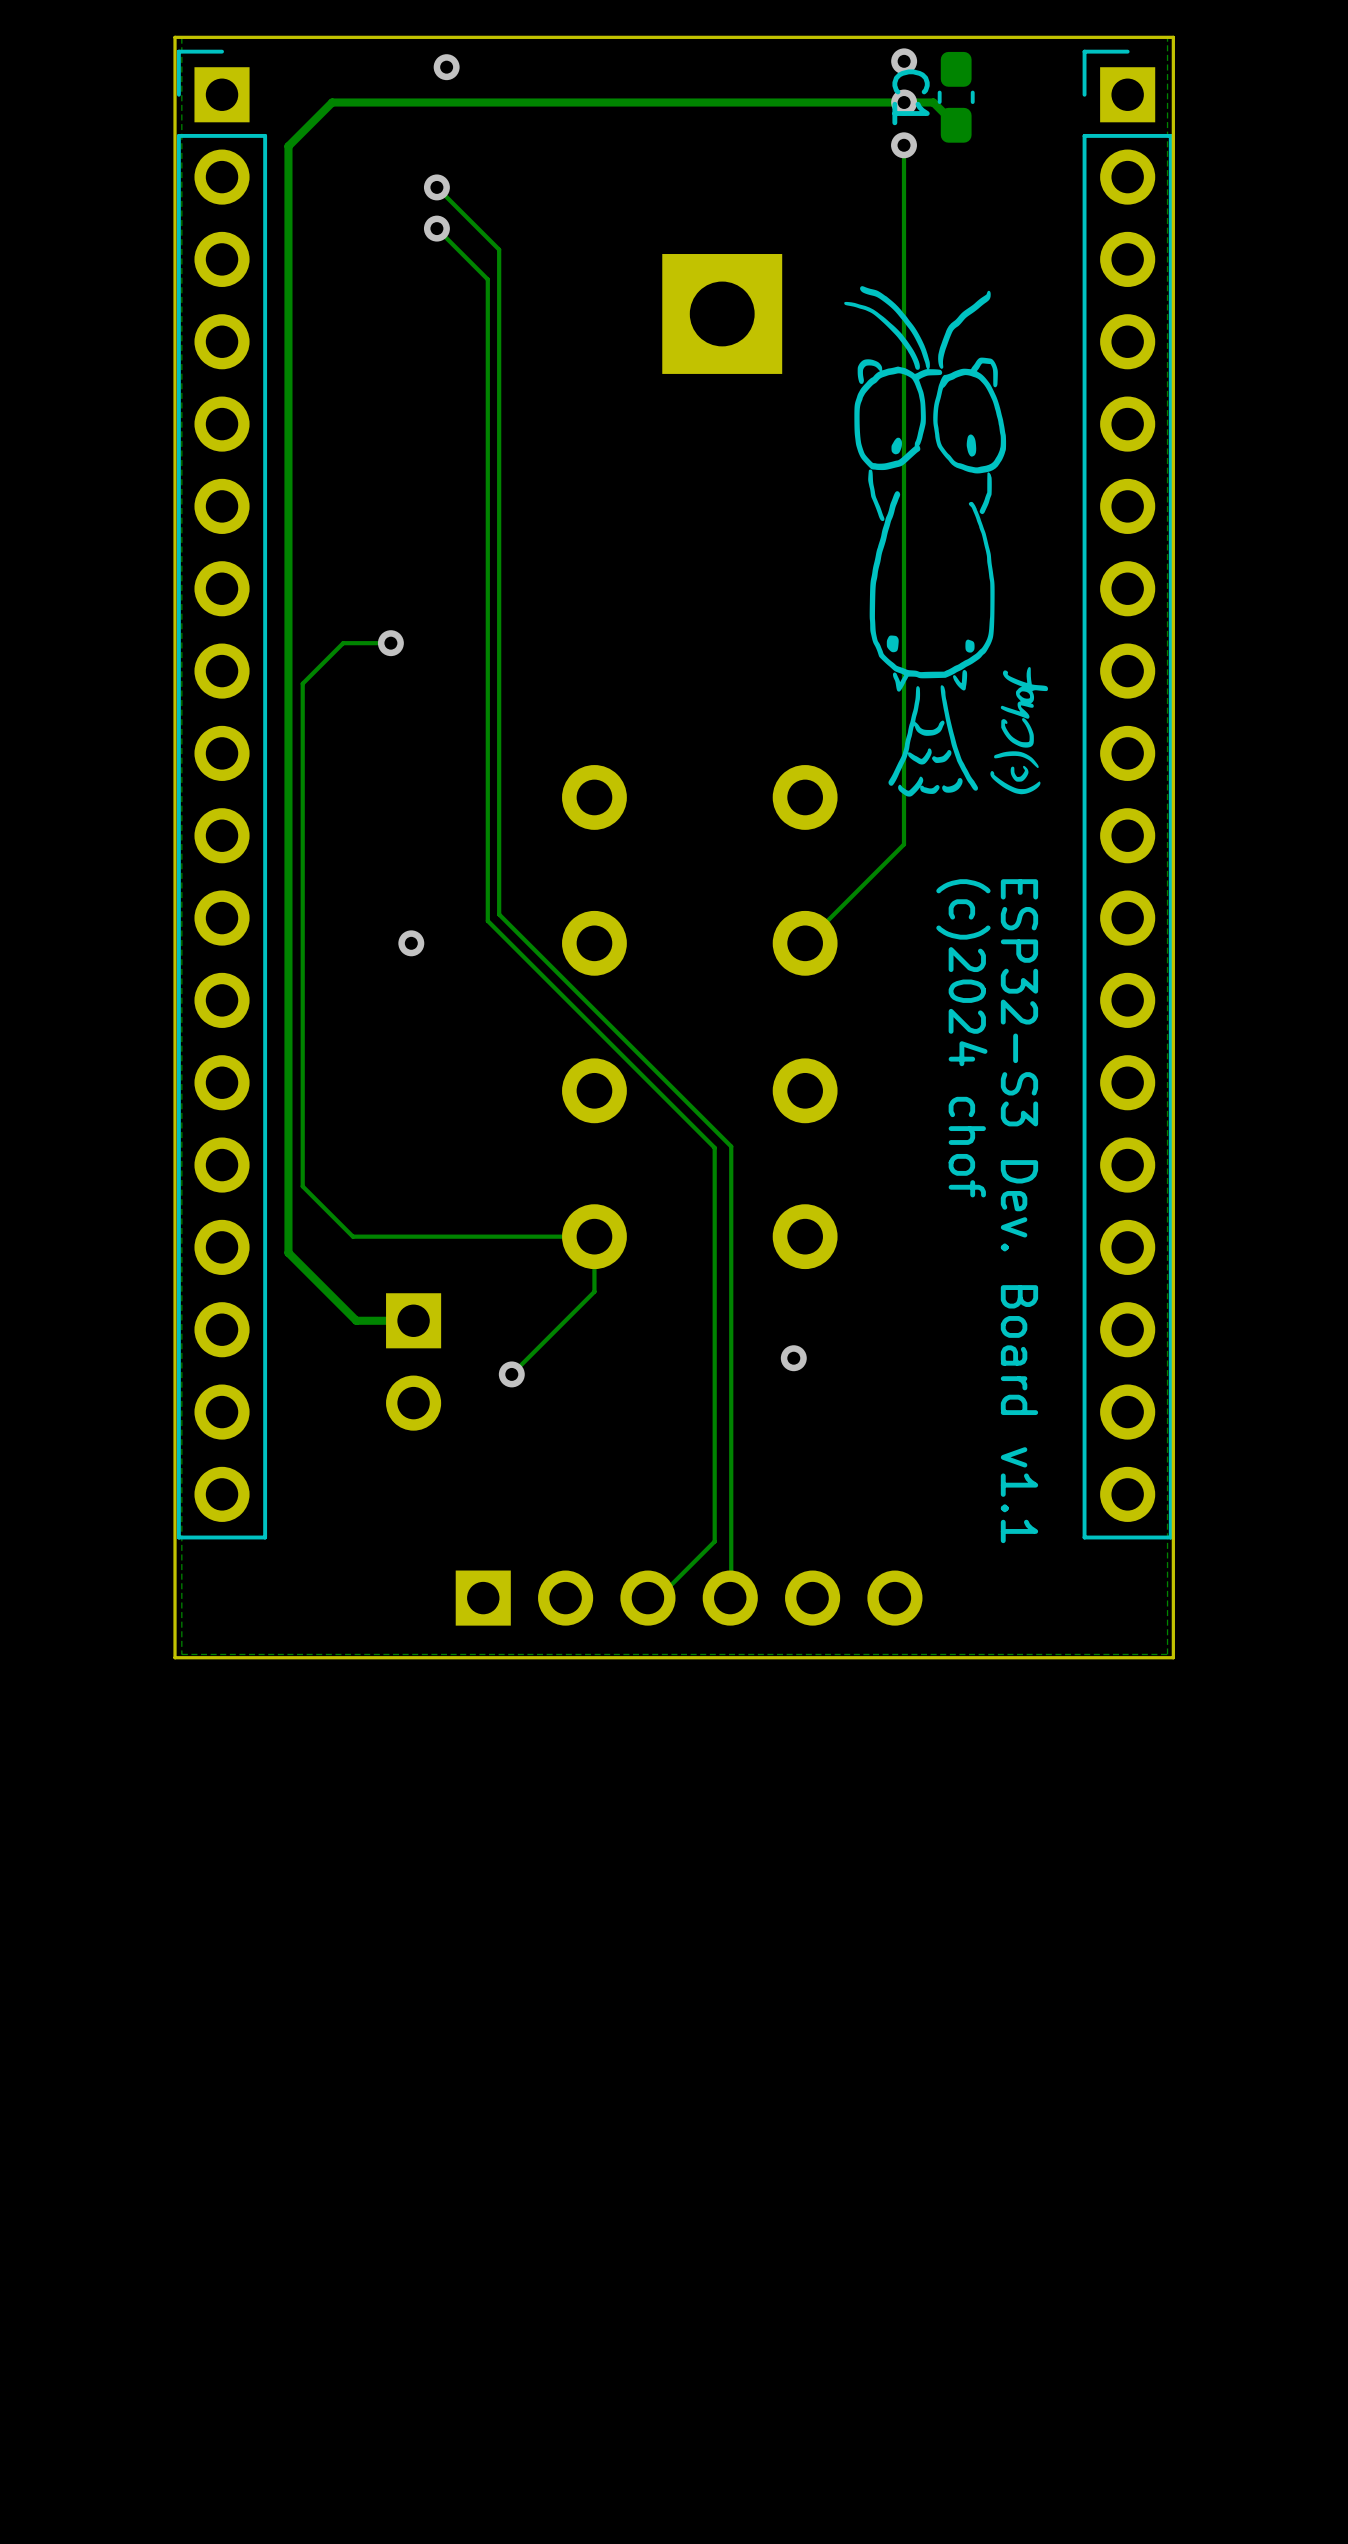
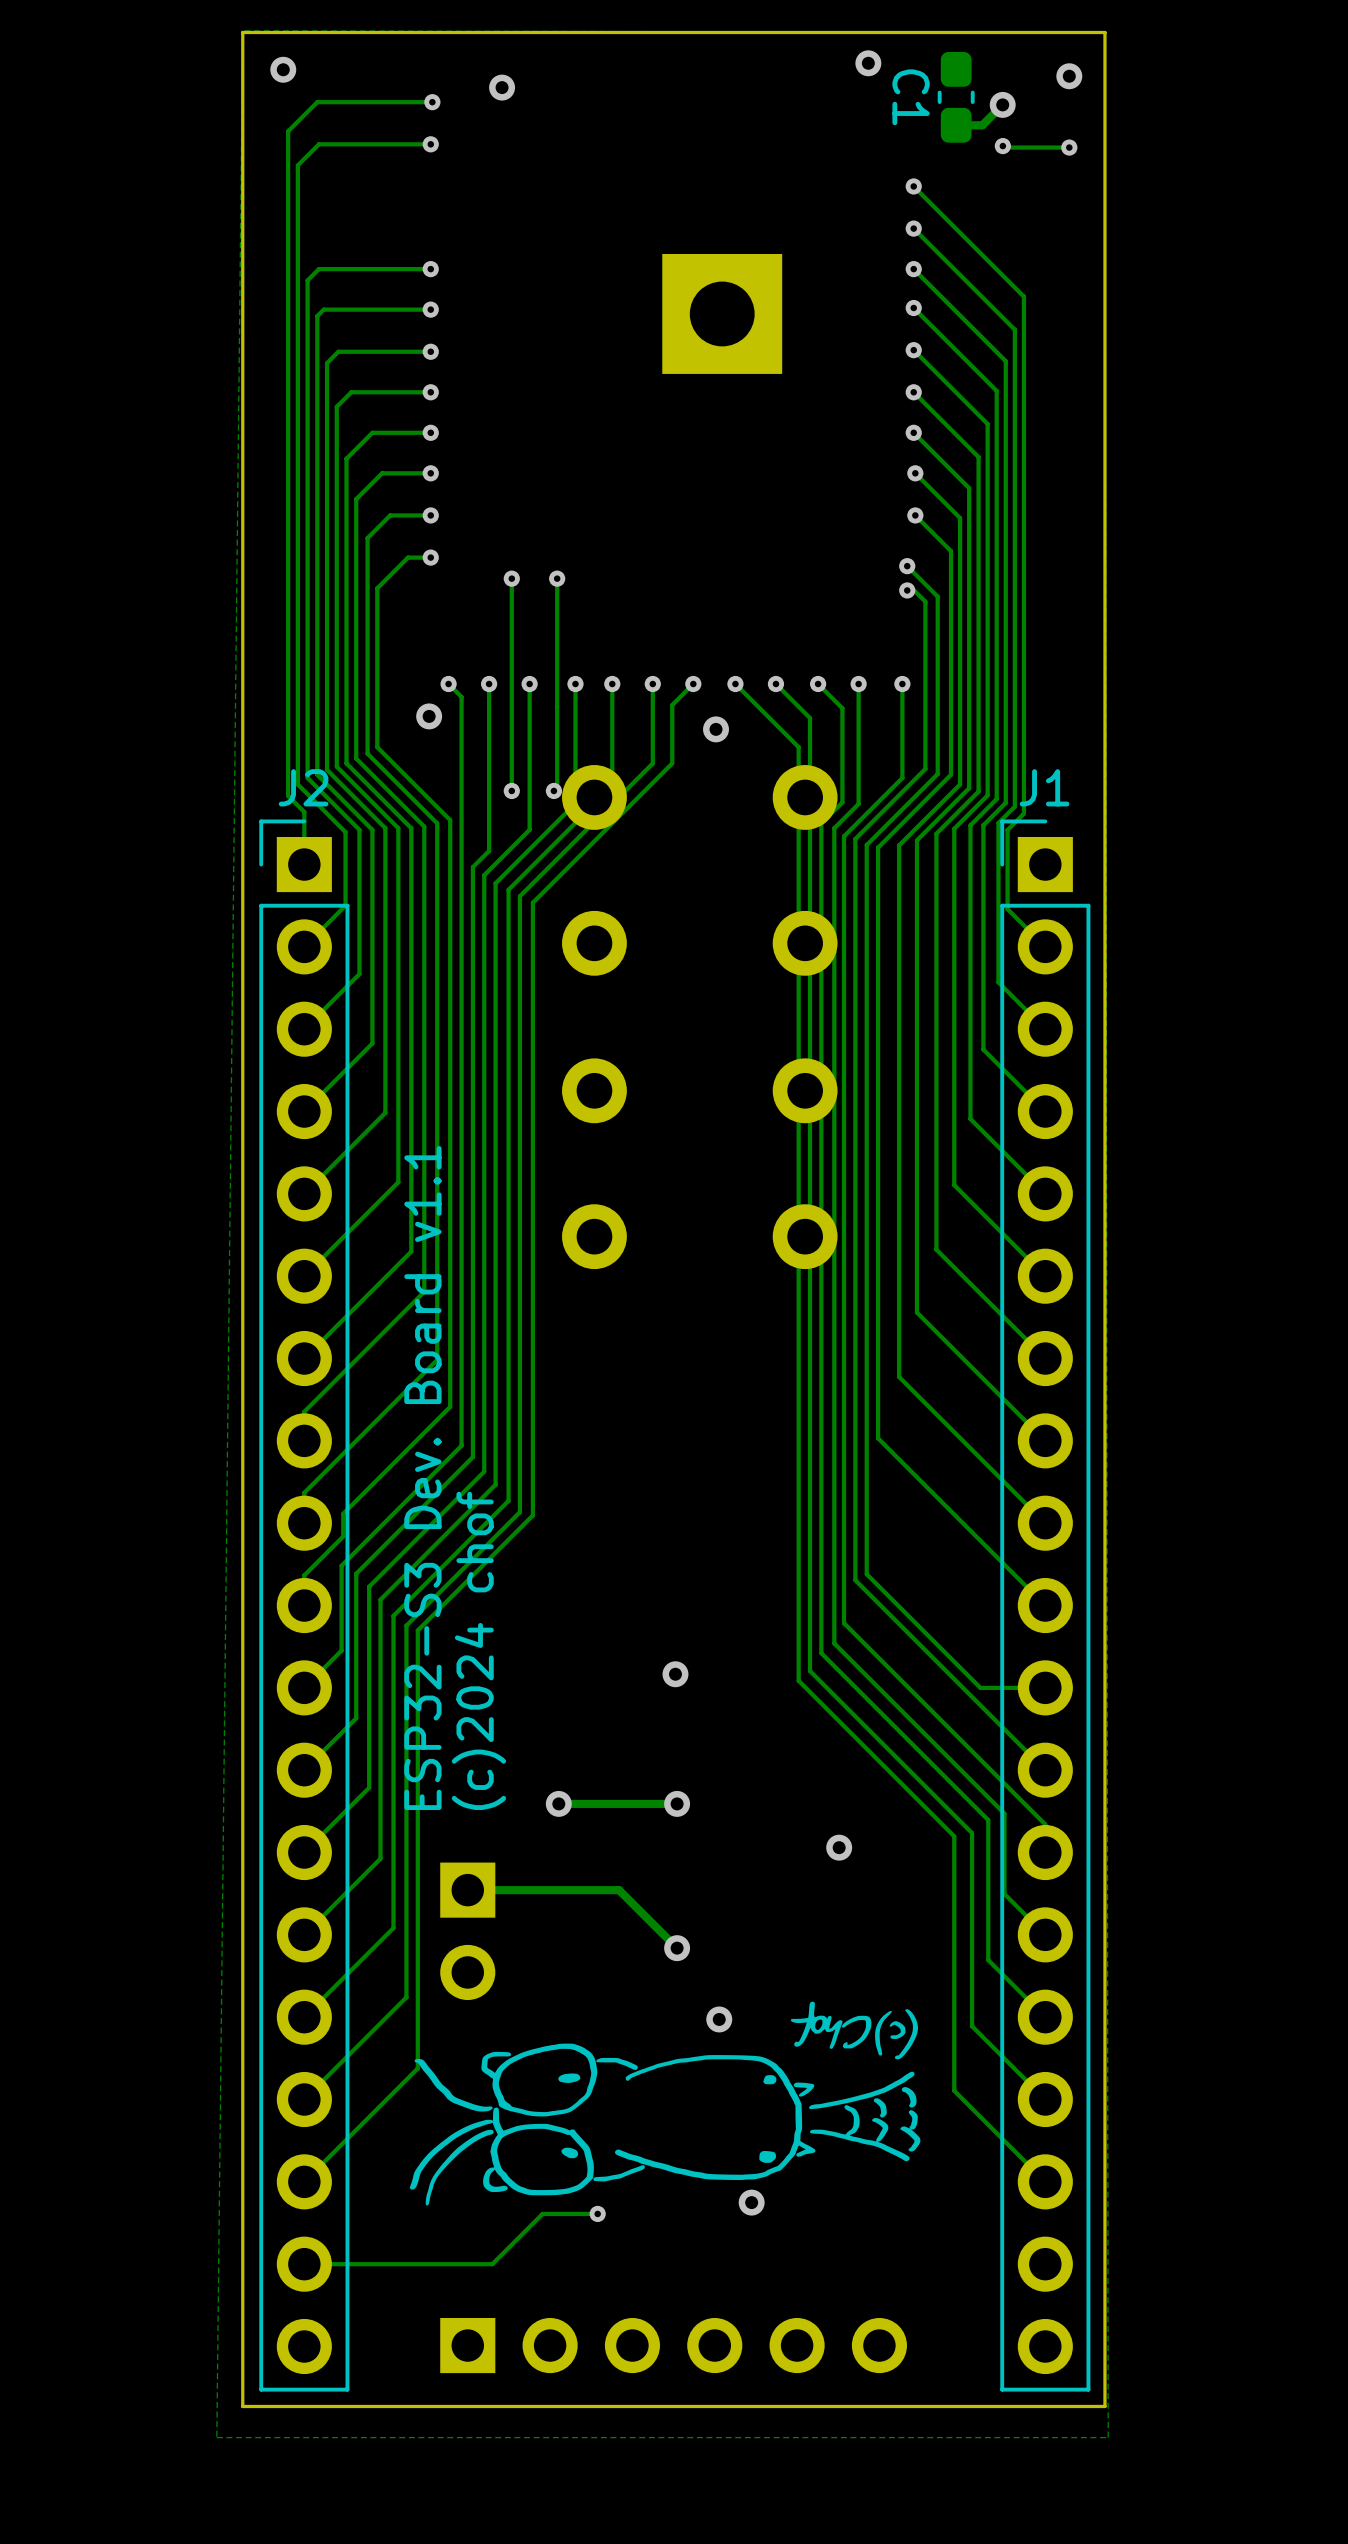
zone outline: (1167, 37) (1167, 1654) (181, 1654) (181, 37) (1167, 37) -> (242, 30) (1104, 32) (1108, 2437) (216, 2437) (242, 30)
board edge: (1173, 37) (175, 37) (175, 1657) (1173, 1657) (1173, 37) -> (1104, 32) (1104, 2406) (242, 2406) (242, 32) (1104, 32)
via: (904, 61) -> none
via: none -> (868, 63)
via position: (446, 67) -> (502, 87)
via: none -> (283, 69)
via: none -> (1069, 76)
track: none -> (432, 102) (317, 102) (288, 131) (288, 795) (304, 812) (304, 864)
via: none -> (432, 102)
via: (904, 102) -> none
via: none -> (1002, 104)
track: (956, 125) (933, 102) (332, 102) (288, 146) (288, 1252) (356, 1320) (413, 1320) -> (956, 125) (982, 125) (1002, 104)
track: none -> (430, 144) (318, 144) (297, 165) (297, 784) (345, 832) (345, 905) (304, 946)
via: none -> (430, 144)
track: (904, 145) (904, 844) (805, 943) -> none
via: (904, 145) -> none
track: none -> (1002, 146) (1069, 147)
via: none -> (1002, 146)
via: none -> (1069, 147)
track: none -> (913, 186) (1023, 296) (1023, 813) (1007, 830) (1007, 909) (1045, 946)
via: none -> (913, 186)
track: (436, 187) (499, 249) (499, 914) (731, 1146) (731, 1607) -> none
via: (436, 187) -> none
track: (436, 228) (487, 279) (487, 920) (714, 1147) (714, 1541) (648, 1607) -> none
via: (436, 228) -> none
track: none -> (913, 228) (1014, 329) (1014, 806) (998, 823) (998, 982) (1045, 1029)
via: none -> (913, 228)
track: none -> (430, 269) (318, 269) (307, 280) (307, 778) (359, 829) (359, 974) (304, 1029)
via: none -> (430, 269)
track: none -> (913, 269) (1005, 361) (1005, 802) (983, 825) (983, 1049) (1045, 1111)
via: none -> (913, 269)
drawing: [844, 286, 1049, 797] -> none
track: none -> (913, 308) (996, 390) (996, 799) (970, 825) (970, 1119) (1045, 1193)
via: none -> (913, 308)
track: none -> (430, 309) (323, 309) (317, 316) (317, 774) (372, 829) (372, 1043) (304, 1111)
via: none -> (430, 309)
track: none -> (913, 350) (987, 424) (987, 795) (954, 828) (954, 1185) (1045, 1276)
via: none -> (913, 350)
track: none -> (430, 351) (338, 351) (327, 363) (327, 769) (385, 828) (385, 1112) (304, 1193)
via: none -> (430, 351)
track: none -> (430, 392) (351, 392) (336, 406) (336, 766) (398, 828) (398, 1182) (304, 1276)
via: none -> (430, 392)
track: none -> (913, 392) (978, 457) (978, 791) (936, 833) (936, 1249) (1045, 1358)
via: none -> (913, 392)
track: none -> (430, 432) (372, 432) (346, 458) (346, 763) (411, 828) (411, 1251) (304, 1358)
via: none -> (430, 432)
track: none -> (913, 432) (969, 488) (969, 788) (916, 840) (916, 1312) (1045, 1440)
via: none -> (913, 432)
track: none -> (430, 473) (382, 473) (356, 499) (356, 758) (424, 826) (424, 1291) (304, 1411) (304, 1440)
via: none -> (430, 473)
track: none -> (915, 473) (960, 518) (960, 784) (899, 845) (899, 1377) (1045, 1523)
via: none -> (915, 473)
track: none -> (430, 515) (390, 515) (367, 538) (367, 753) (437, 823) (437, 1359) (304, 1492) (304, 1523)
via: none -> (430, 515)
track: none -> (915, 515) (951, 551) (951, 774) (878, 847) (878, 1438) (1045, 1605)
via: none -> (915, 515)
track: none -> (430, 557) (408, 557) (377, 588) (377, 747) (450, 820) (450, 1406) (343, 1513) (343, 1536) (304, 1575) (304, 1605)
via: none -> (430, 557)
track: none -> (907, 566) (937, 596) (937, 774) (866, 845) (866, 1574) (980, 1687) (1045, 1687)
via: none -> (907, 566)
track: none -> (511, 578) (511, 790)
via: none -> (511, 578)
track: none -> (557, 578) (557, 787) (553, 790)
via: none -> (557, 578)
track: none -> (907, 590) (914, 590) (925, 601) (925, 768) (855, 838) (855, 1580) (1045, 1770)
via: none -> (907, 590)
track: (390, 643) (343, 643) (302, 683) (302, 1186) (352, 1236) (594, 1236) (594, 1291) (511, 1374) -> none
via position: (390, 643) -> (429, 716)
track: none -> (448, 684) (461, 696) (461, 1445) (341, 1565) (341, 1650) (304, 1687)
via: none -> (448, 684)
track: none -> (489, 684) (489, 850) (472, 867) (472, 1457) (356, 1573) (356, 1718) (304, 1770)
via: none -> (489, 684)
track: none -> (529, 684) (529, 829) (484, 875) (484, 1471) (369, 1586) (369, 1787) (304, 1852)
via: none -> (529, 684)
track: none -> (575, 684) (575, 803) (495, 883) (495, 1484) (380, 1599) (380, 1858) (304, 1934)
via: none -> (575, 684)
track: none -> (612, 684) (612, 786) (508, 889) (508, 1500) (393, 1615) (393, 1928) (304, 2017)
via: none -> (612, 684)
track: none -> (652, 684) (652, 763) (519, 896) (519, 1512) (406, 1625) (406, 1997) (304, 2099)
via: none -> (652, 684)
track: none -> (693, 684) (672, 705) (672, 763) (532, 902) (532, 1515) (417, 1630) (417, 2068) (304, 2181)
via: none -> (693, 684)
track: none -> (735, 684) (798, 747) (798, 1680) (954, 1836) (954, 2090) (1045, 2181)
via: none -> (735, 684)
track: none -> (775, 684) (810, 718) (810, 1671) (972, 1833) (972, 2026) (1045, 2099)
via: none -> (775, 684)
track: none -> (818, 684) (842, 708) (842, 802) (821, 823) (821, 1653) (988, 1820) (988, 1960) (1045, 2017)
via: none -> (818, 684)
track: none -> (858, 684) (858, 803) (834, 828) (834, 1643) (1004, 1813) (1004, 1894) (1045, 1934)
via: none -> (858, 684)
track: none -> (902, 684) (902, 778) (844, 836) (844, 1623) (1045, 1824) (1045, 1852)
via: none -> (902, 684)
via: none -> (716, 729)
via: none -> (511, 790)
via: none -> (553, 790)
part: (222, 794) -> none
part: (1127, 794) -> none
via: (411, 943) -> none
text: (c)2024 chof (963, 1038) -> none
text: ESP32-S3 Dev. Board v1.1 (1019, 1211) -> none
via: (793, 1358) -> none
part position: (413, 1361) -> (467, 1931)
via: (511, 1374) -> none
text: none -> ESP32-S3 Dev. Board v1.1 (422, 1478)
part position: (689, 1598) -> (673, 2345)
J2: none -> (304, 1605)
J1: none -> (1045, 1605)
text: none -> (c)2024 chof (478, 1650)
via: none -> (675, 1674)
via: none -> (558, 1803)
track: none -> (677, 1803) (560, 1803) (558, 1805)
via: none -> (677, 1803)
via: none -> (839, 1847)
track: none -> (467, 1890) (619, 1890) (677, 1948)
via: none -> (677, 1948)
drawing: none -> [409, 2001, 921, 2206]
via: none -> (719, 2019)
via: none -> (751, 2202)
track: none -> (597, 2213) (542, 2213) (492, 2264) (304, 2264)
via: none -> (597, 2213)

